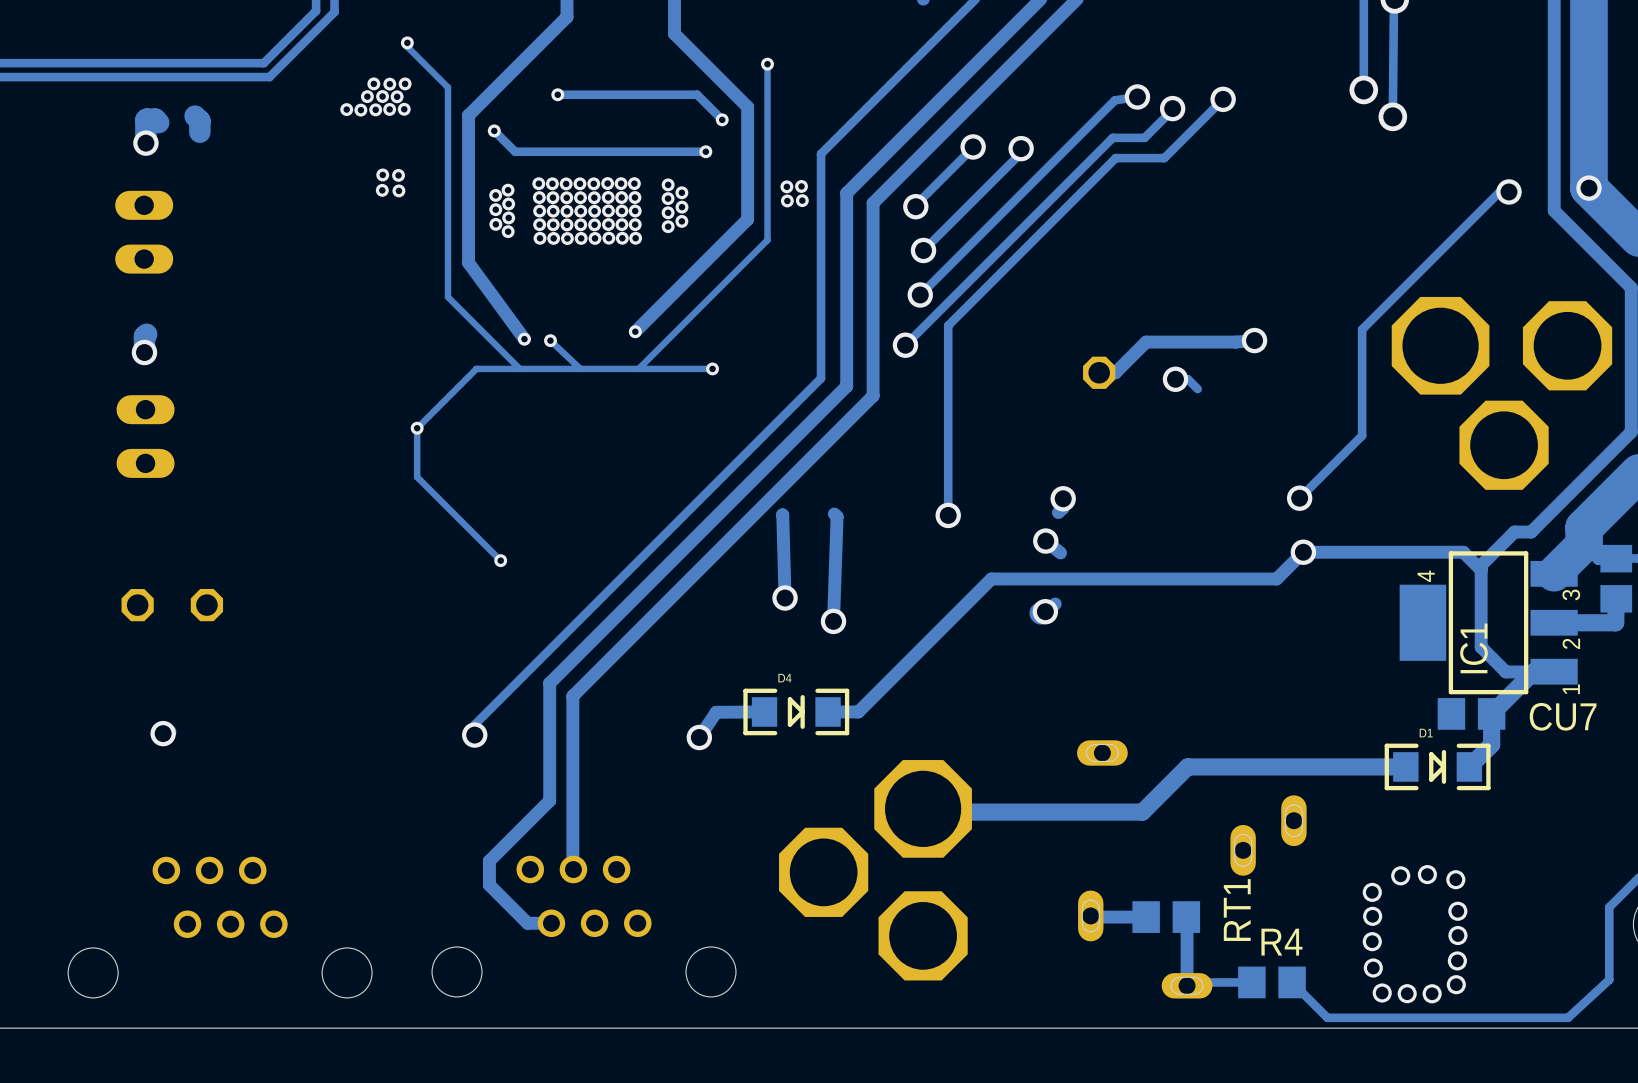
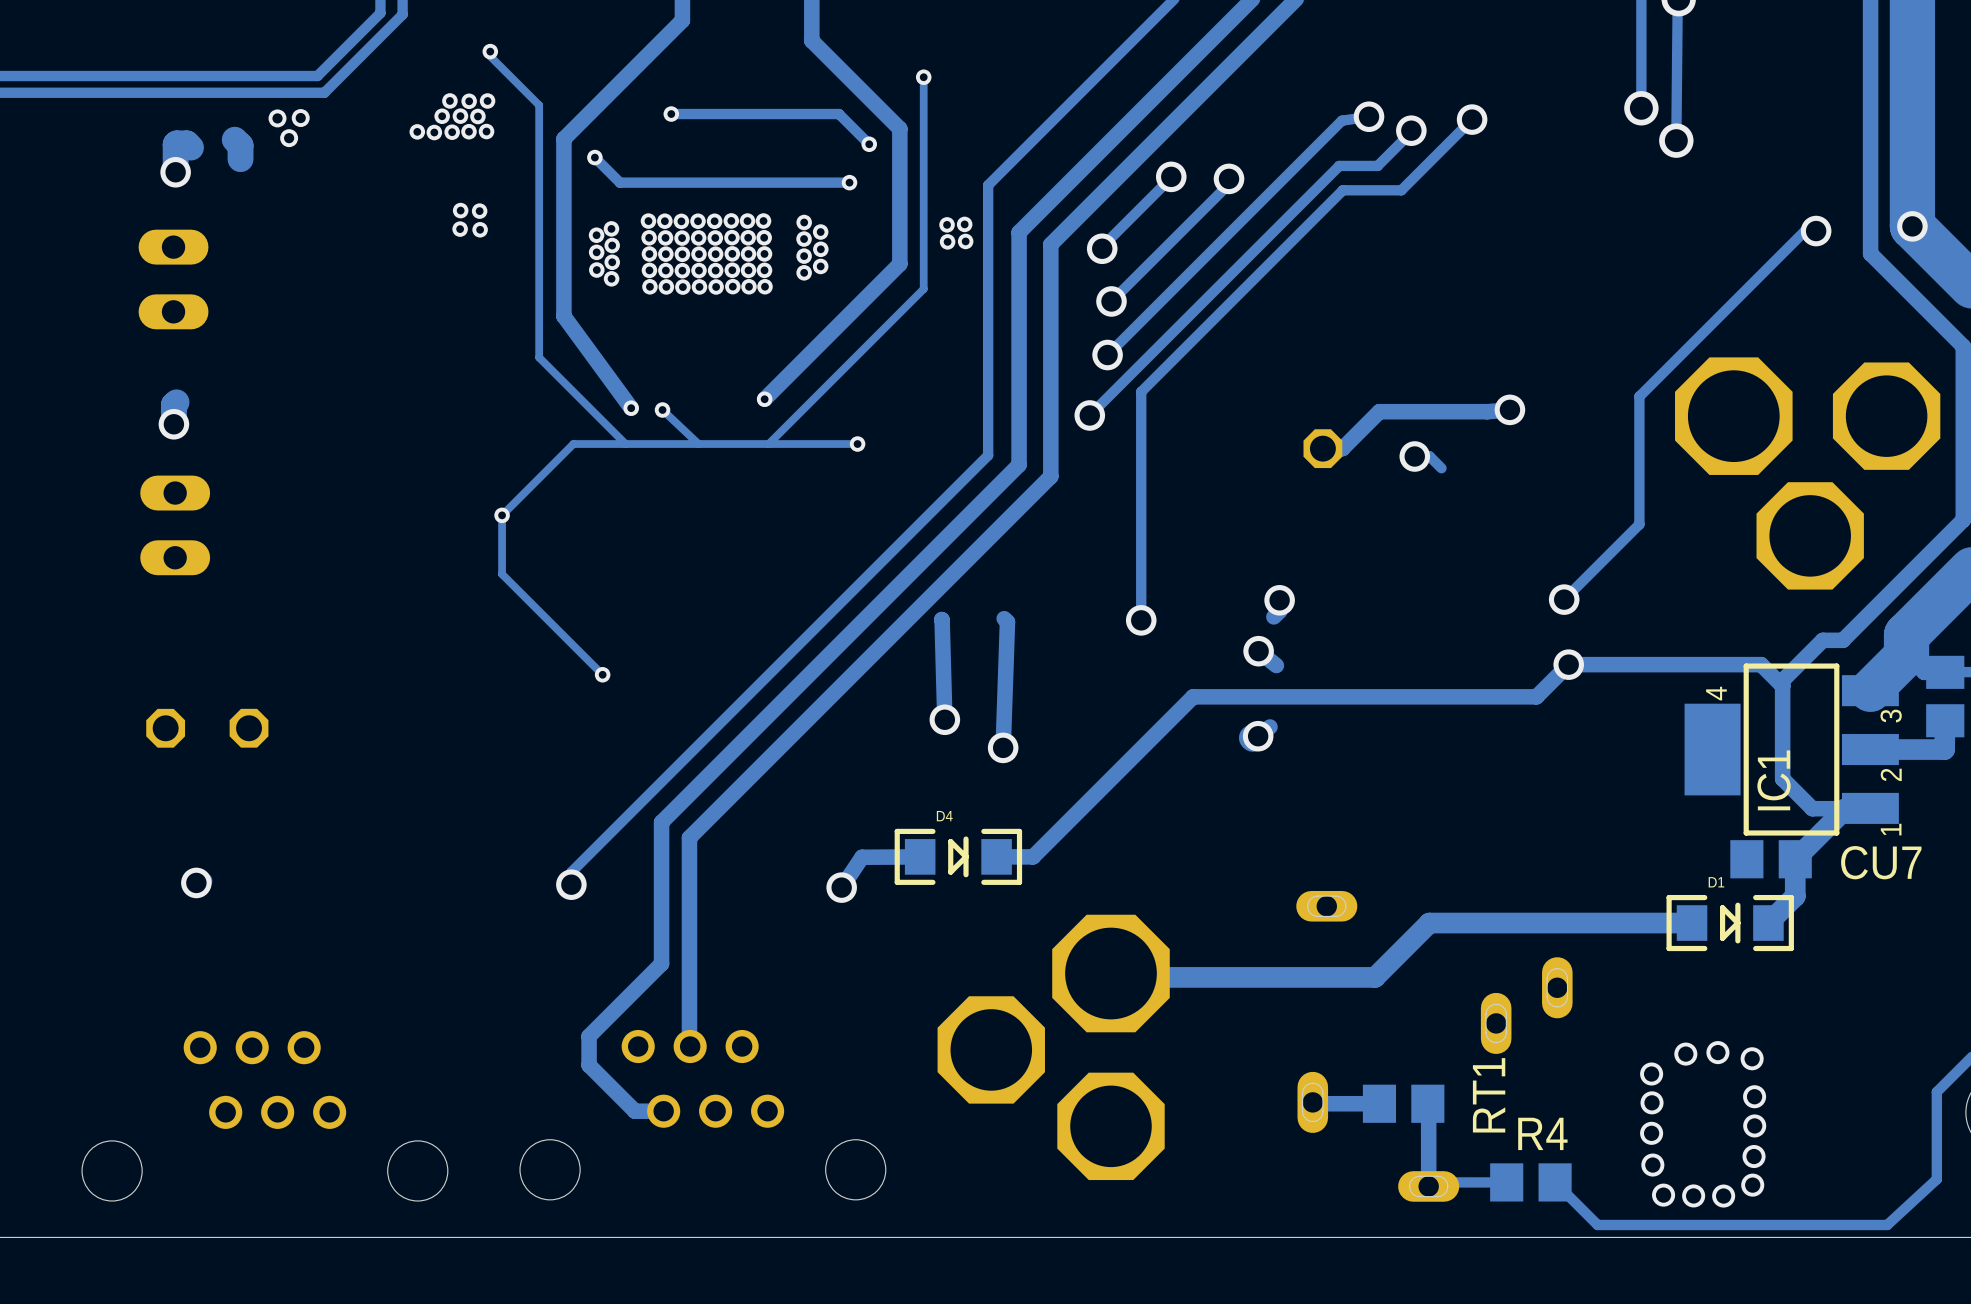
via: none -> (277, 118)
via: none -> (300, 118)
via: none -> (289, 138)

